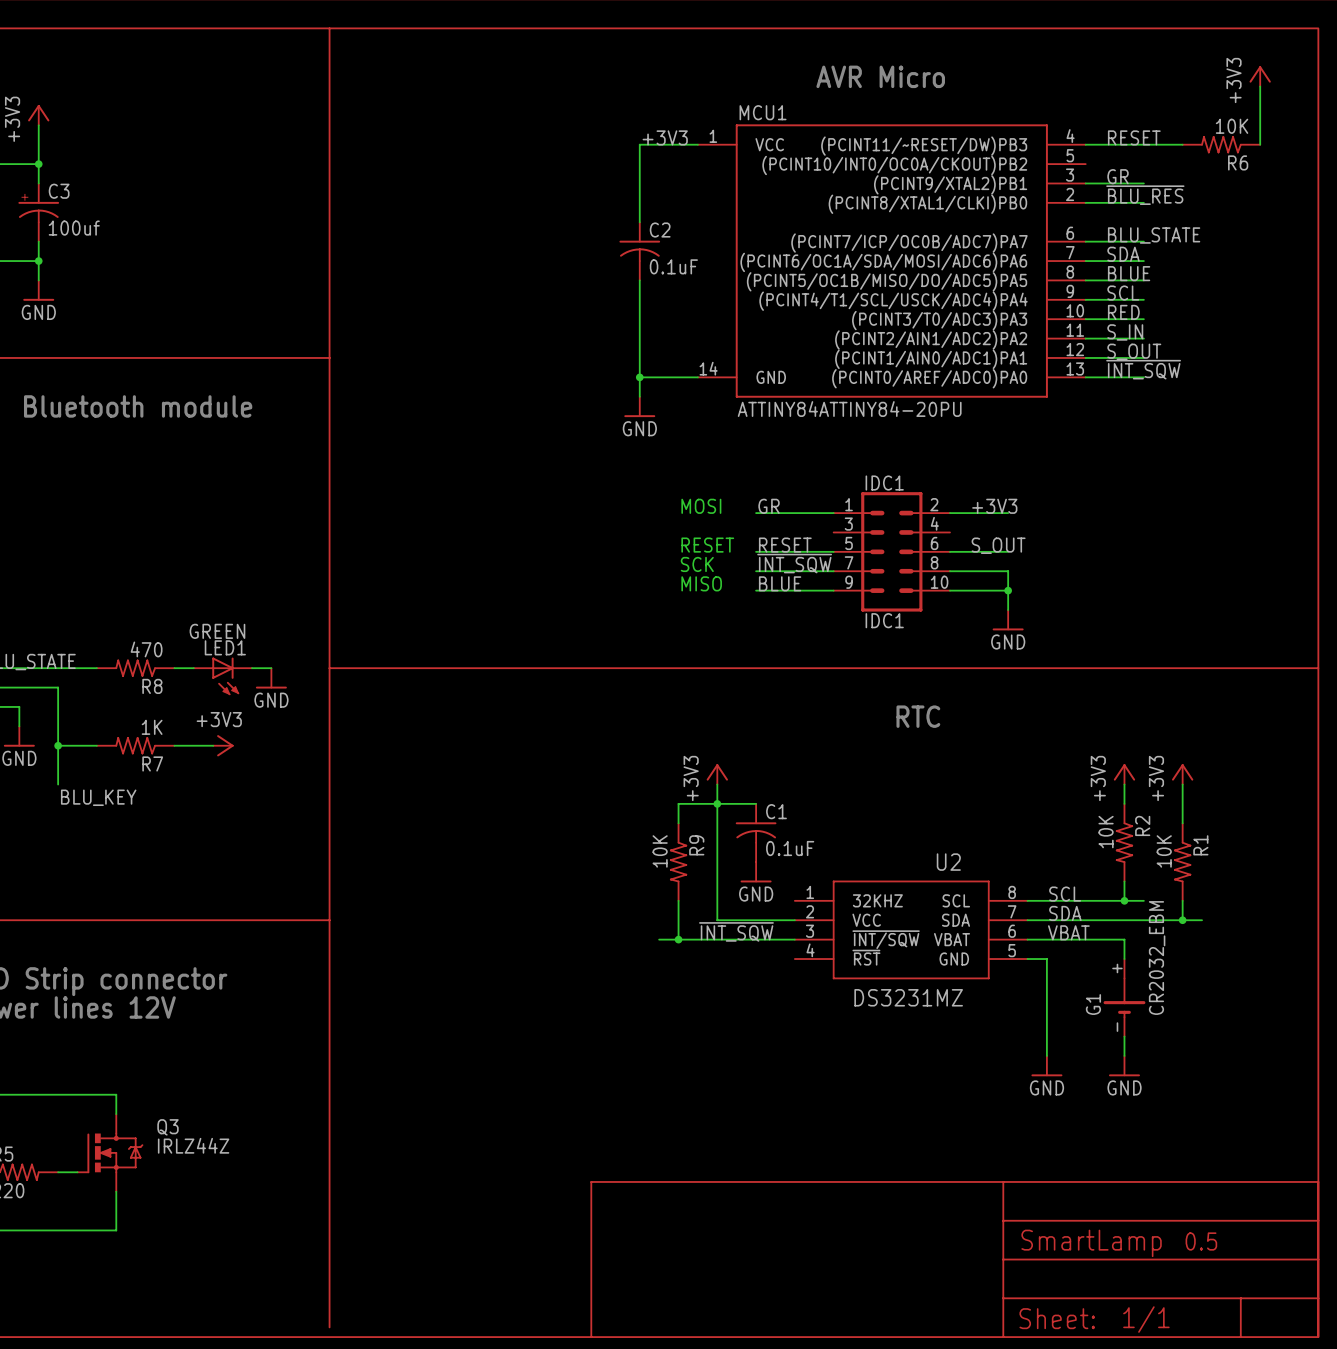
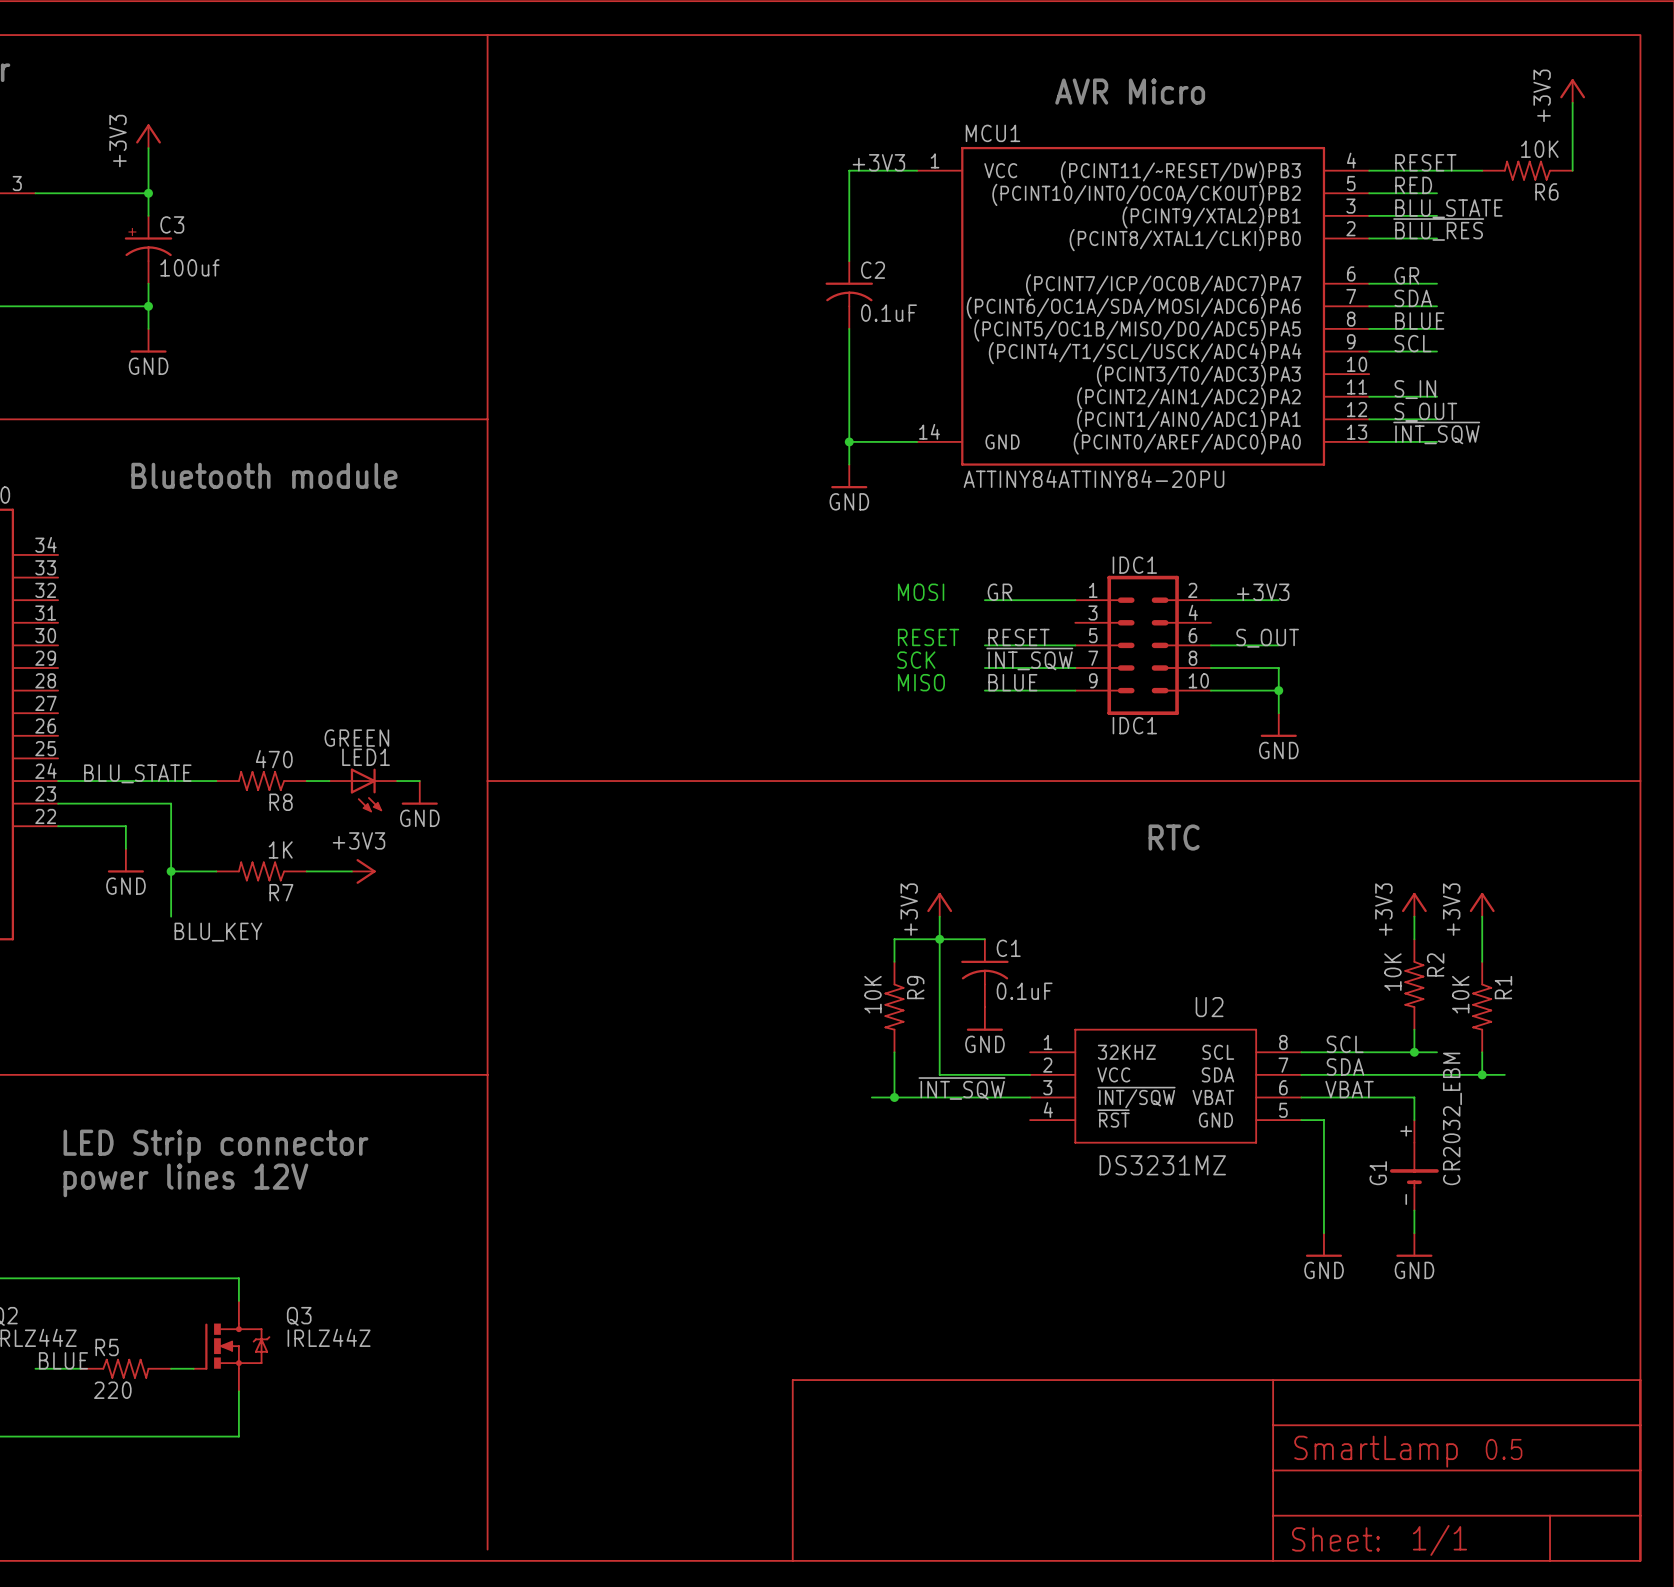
label: GR (1118, 176) -> BLU_STATE (1448, 208)
label: BLU_STATE (1154, 235) -> GR (1406, 275)
label position: RED (1123, 312) -> RED (1413, 185)
wire: (1085, 319) (1143, 319) -> (1369, 193) (1437, 193)

